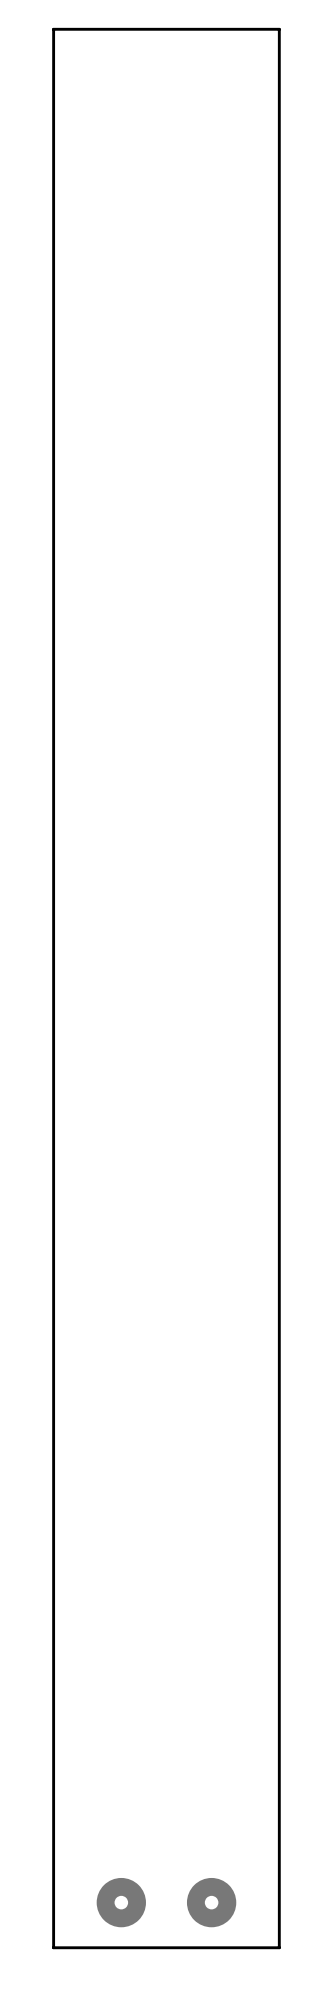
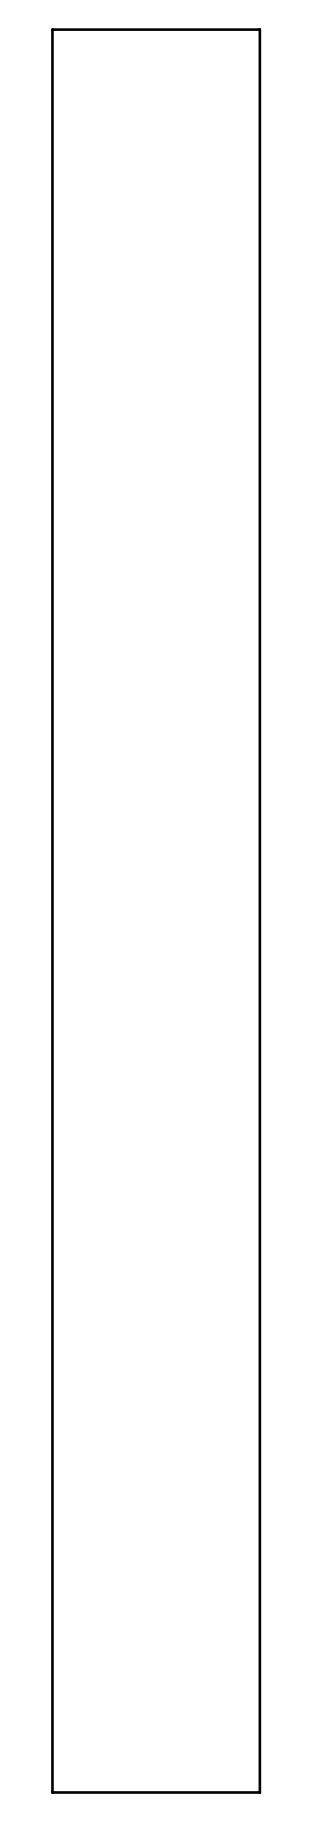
via: (121, 1902) -> none
via: (211, 1902) -> none

